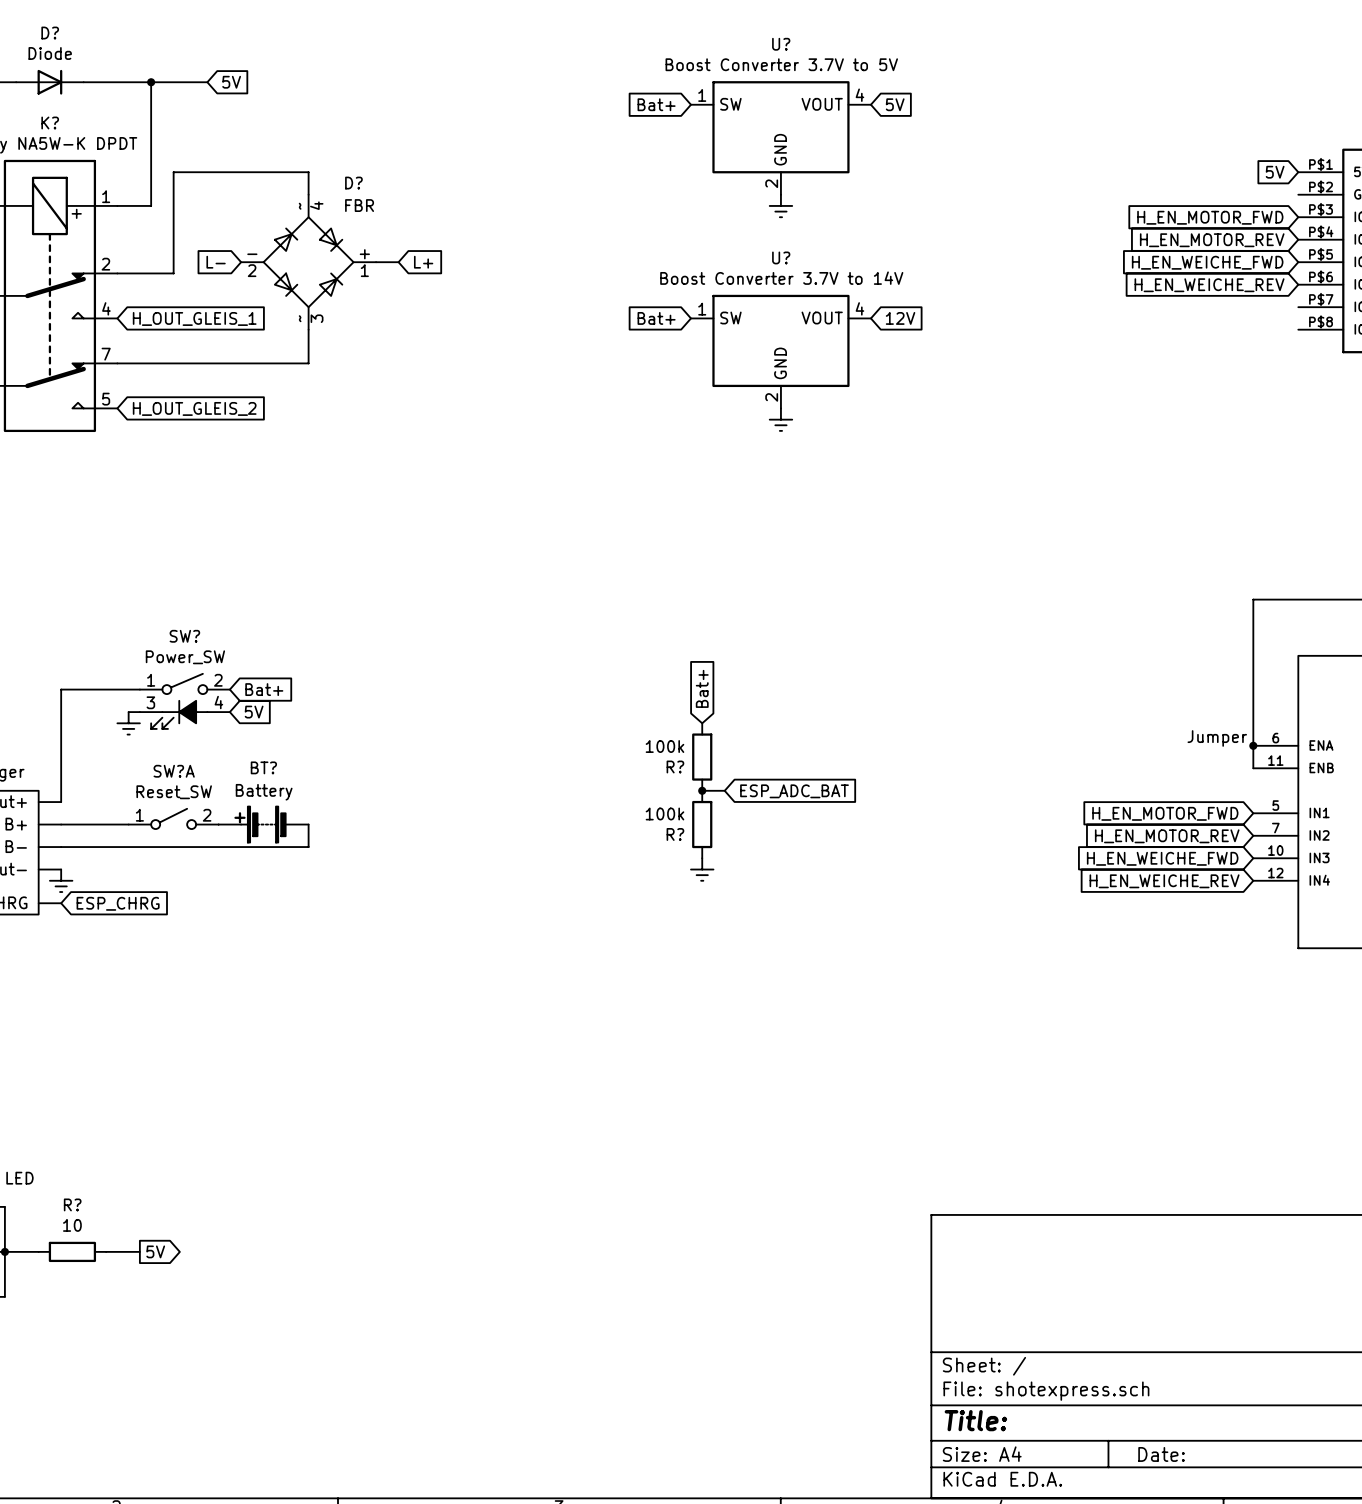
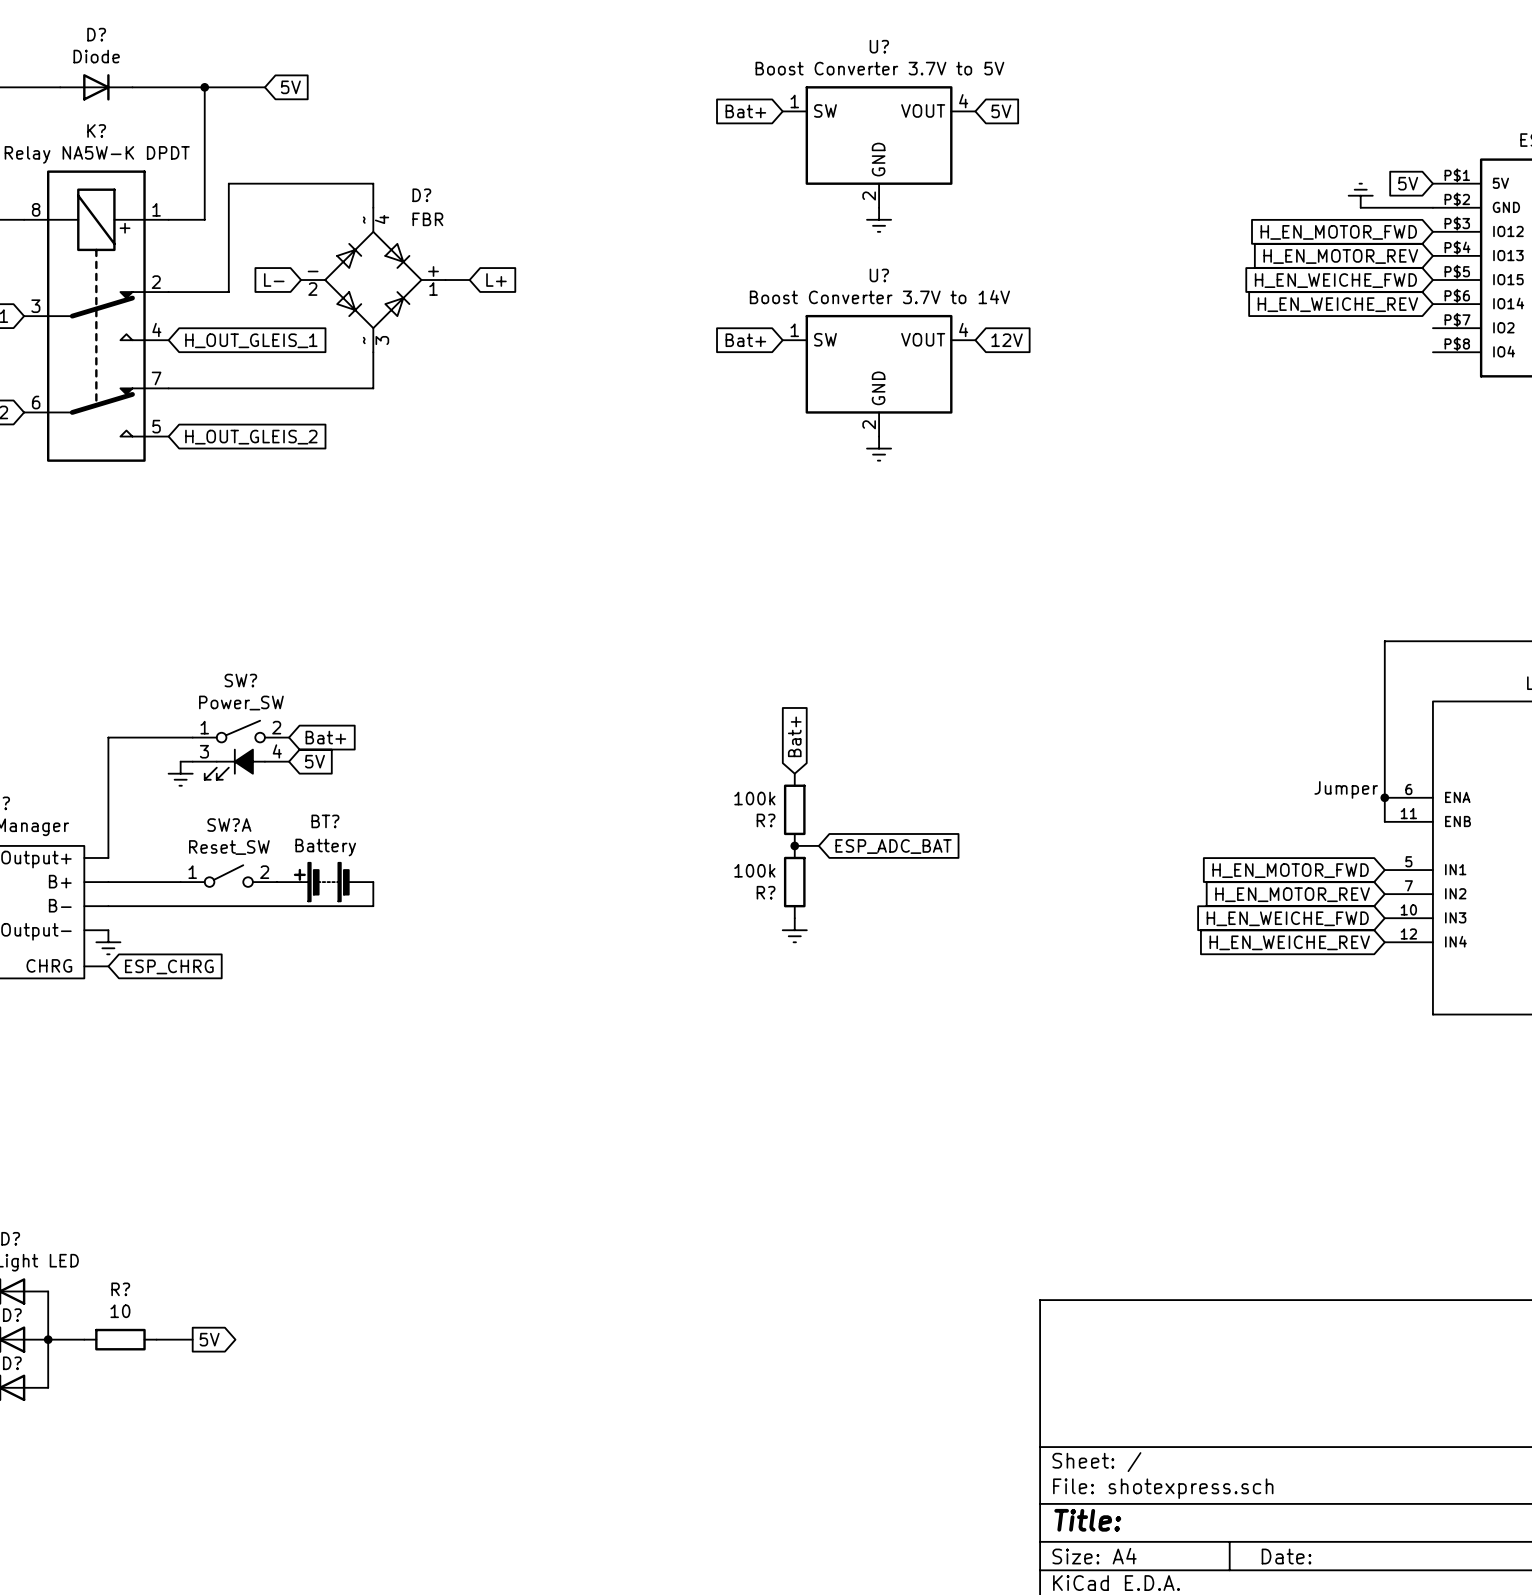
power symbol: none -> (1360, 195)
wire: none -> (1360, 207) (1432, 207)

